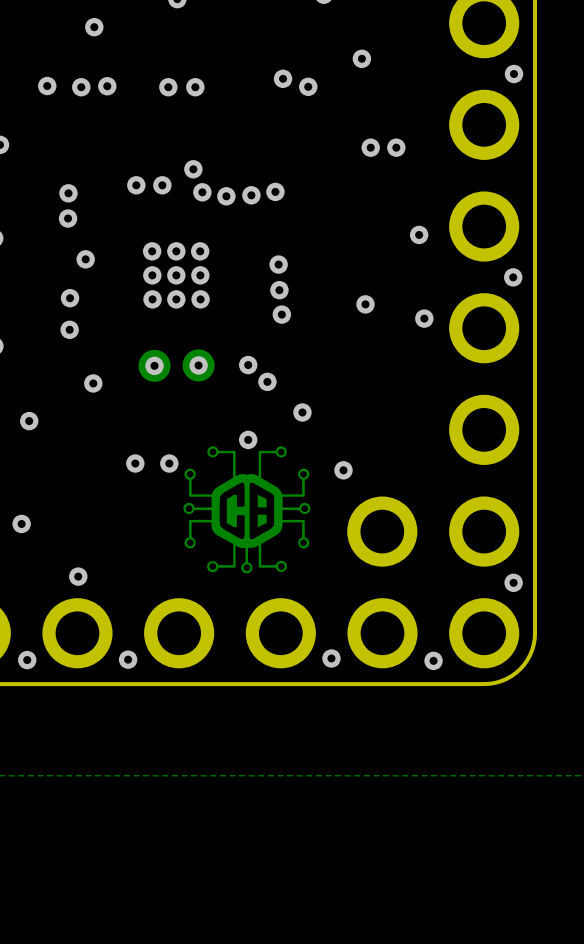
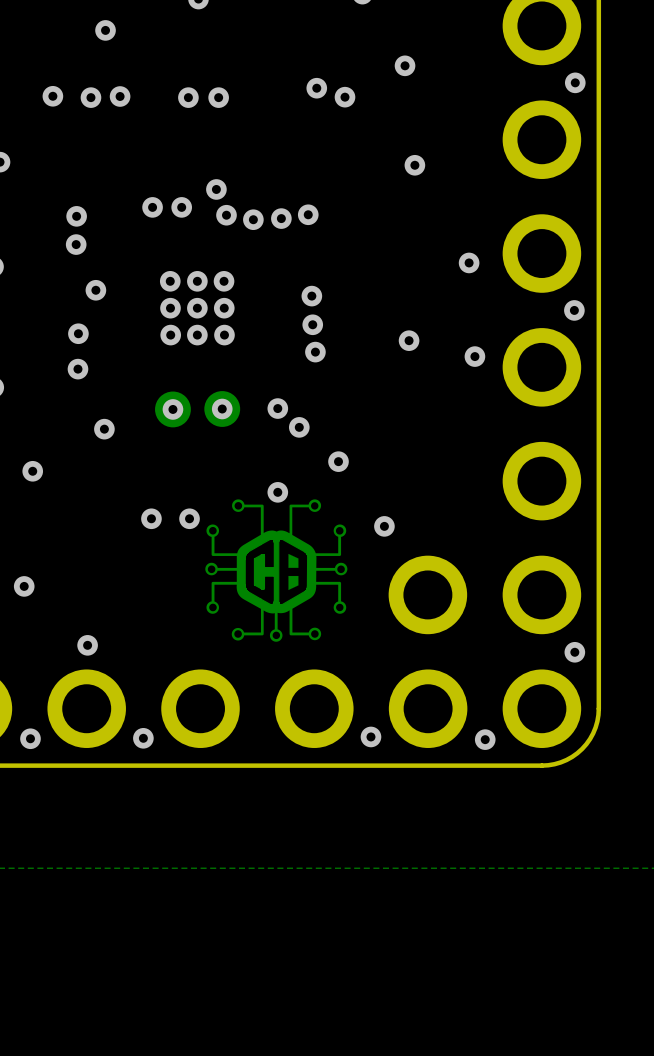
via: (396, 147) -> none

